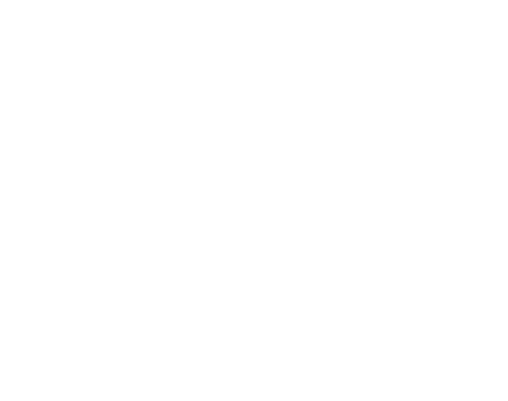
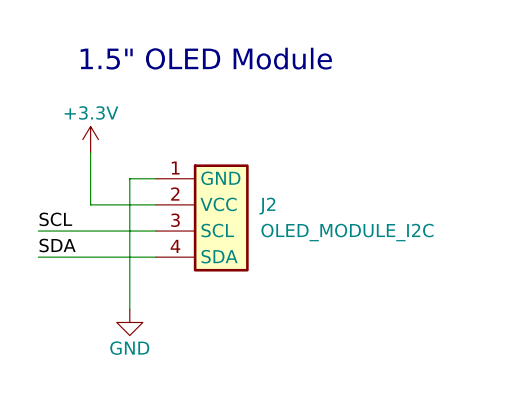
text: none -> 1.5" OLED Module (206, 58)
power symbol: none -> +3.3V (90, 139)
wire: none -> (90, 152) (90, 204) (155, 204)
wire: none -> (155, 178) (129, 178) (129, 309)
J2: none -> OLED_MODULE_I2C (202, 217)
label: none -> SCL (55, 219)
wire: none -> (38, 231) (155, 231)
label: none -> SDA (57, 245)
wire: none -> (38, 257) (155, 257)
power symbol: none -> GND (129, 322)

